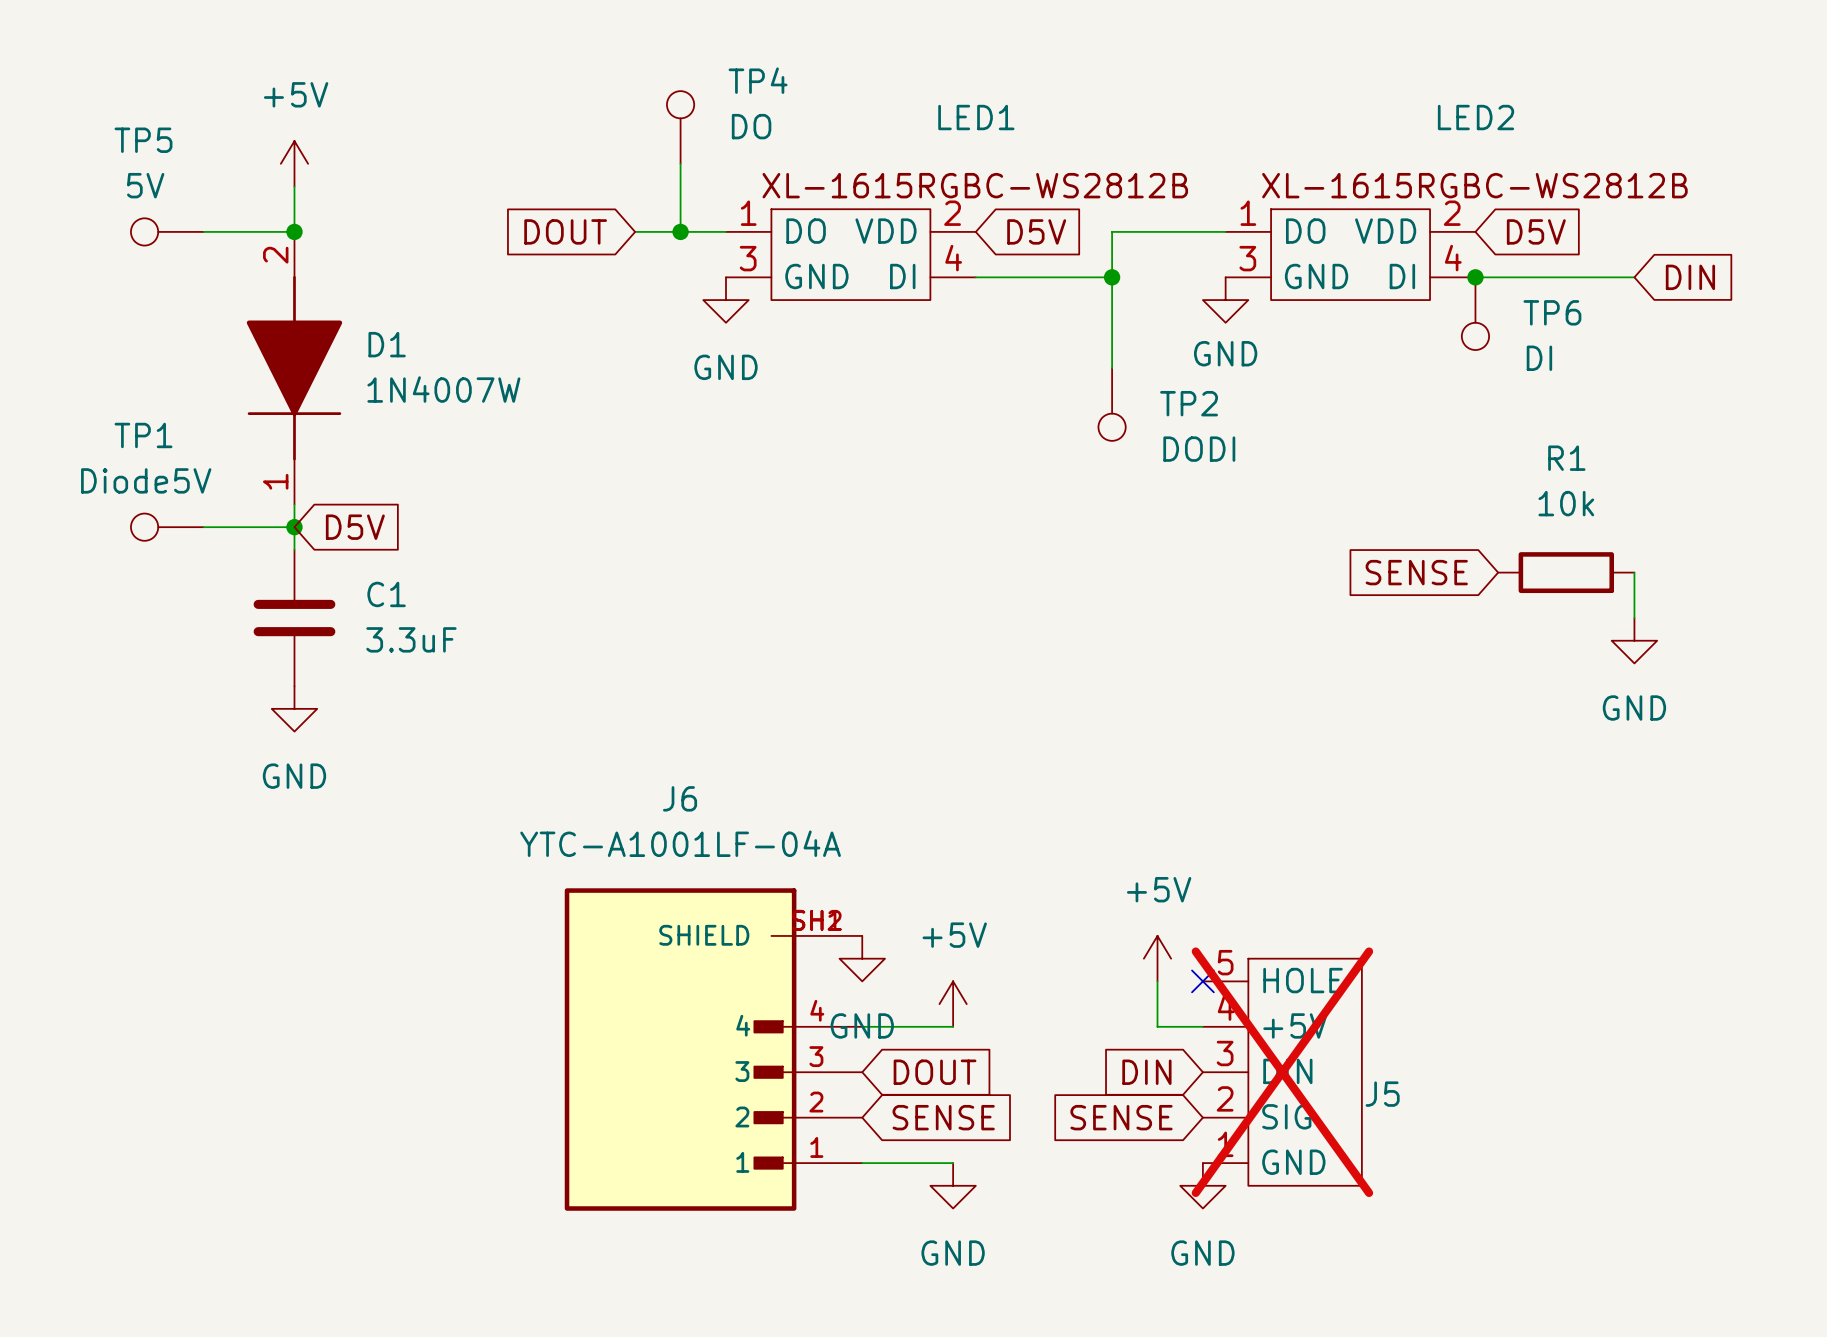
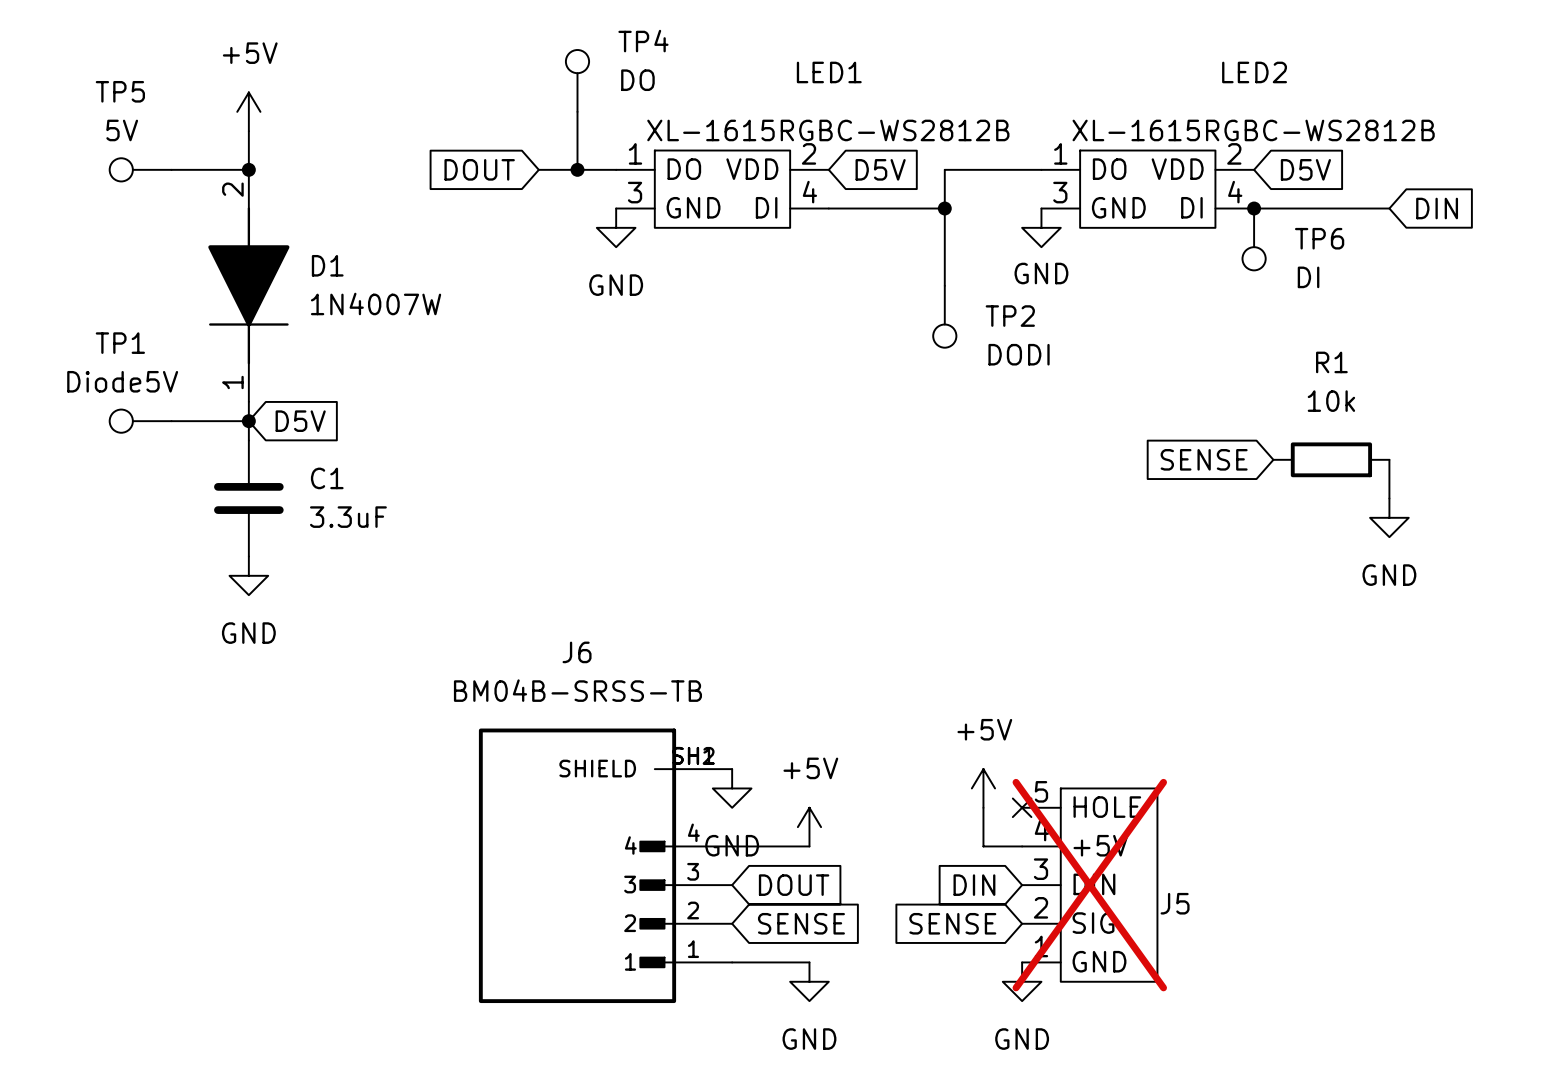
J6 value: YTC-A1001LF-04A (680, 843) -> BM04B-SRSS-TB (577, 690)

